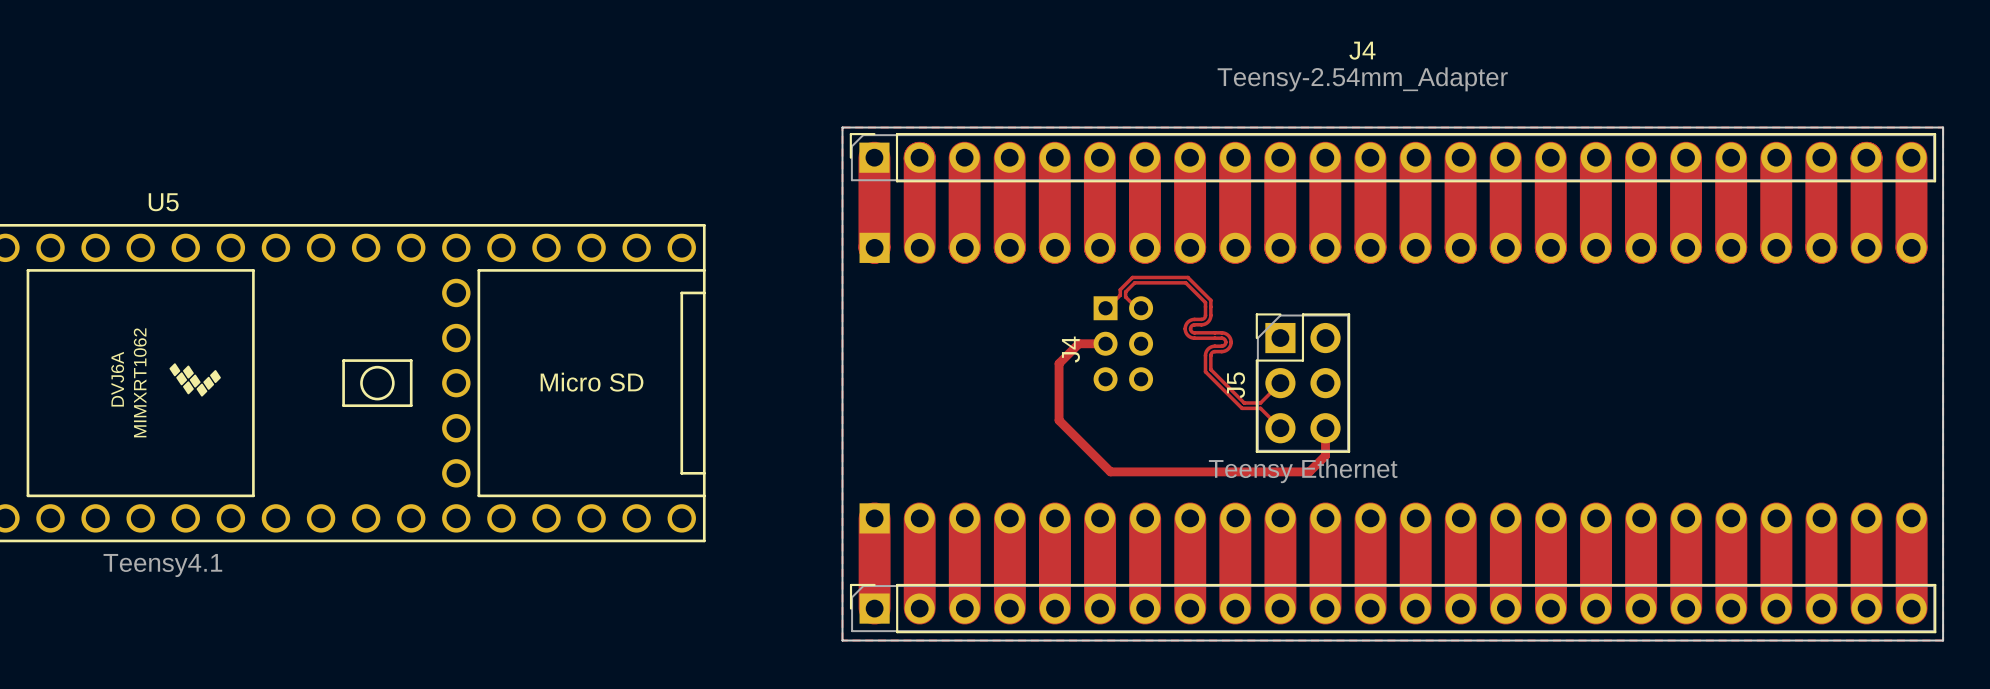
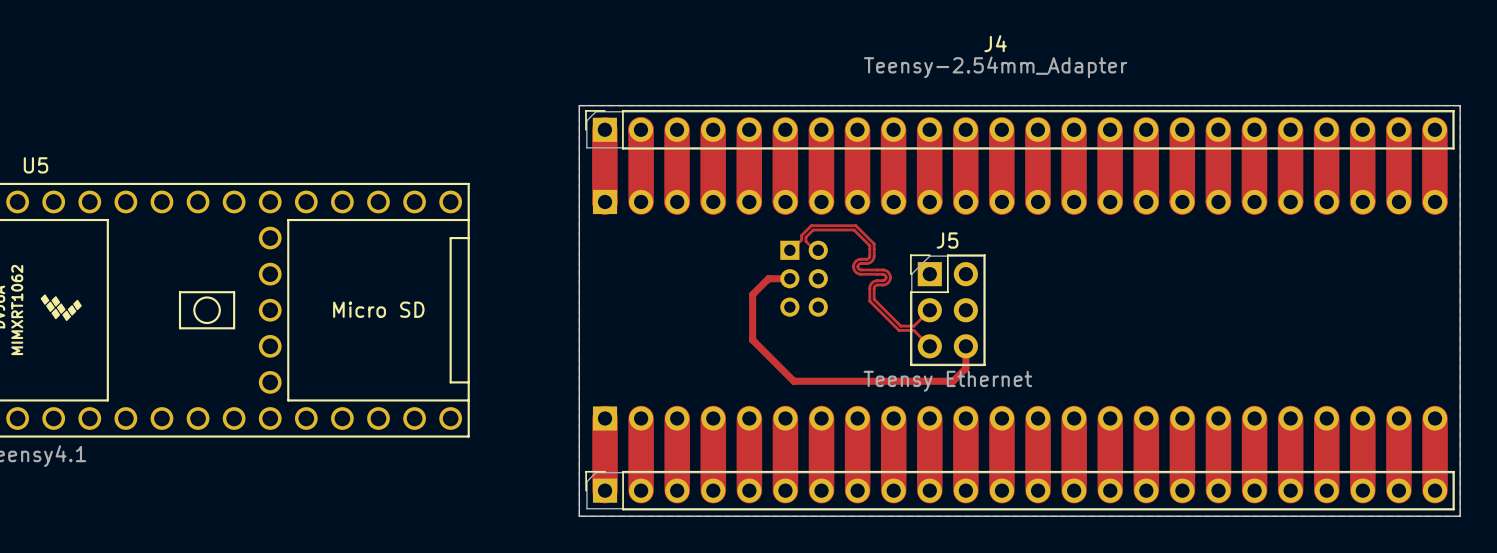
text: J4 (1070, 349) -> none
J5 name rotation: 0° (1236, 385) -> 90° clockwise (947, 240)
J5 name position: J5 (1236, 385) -> J5 (947, 240)

